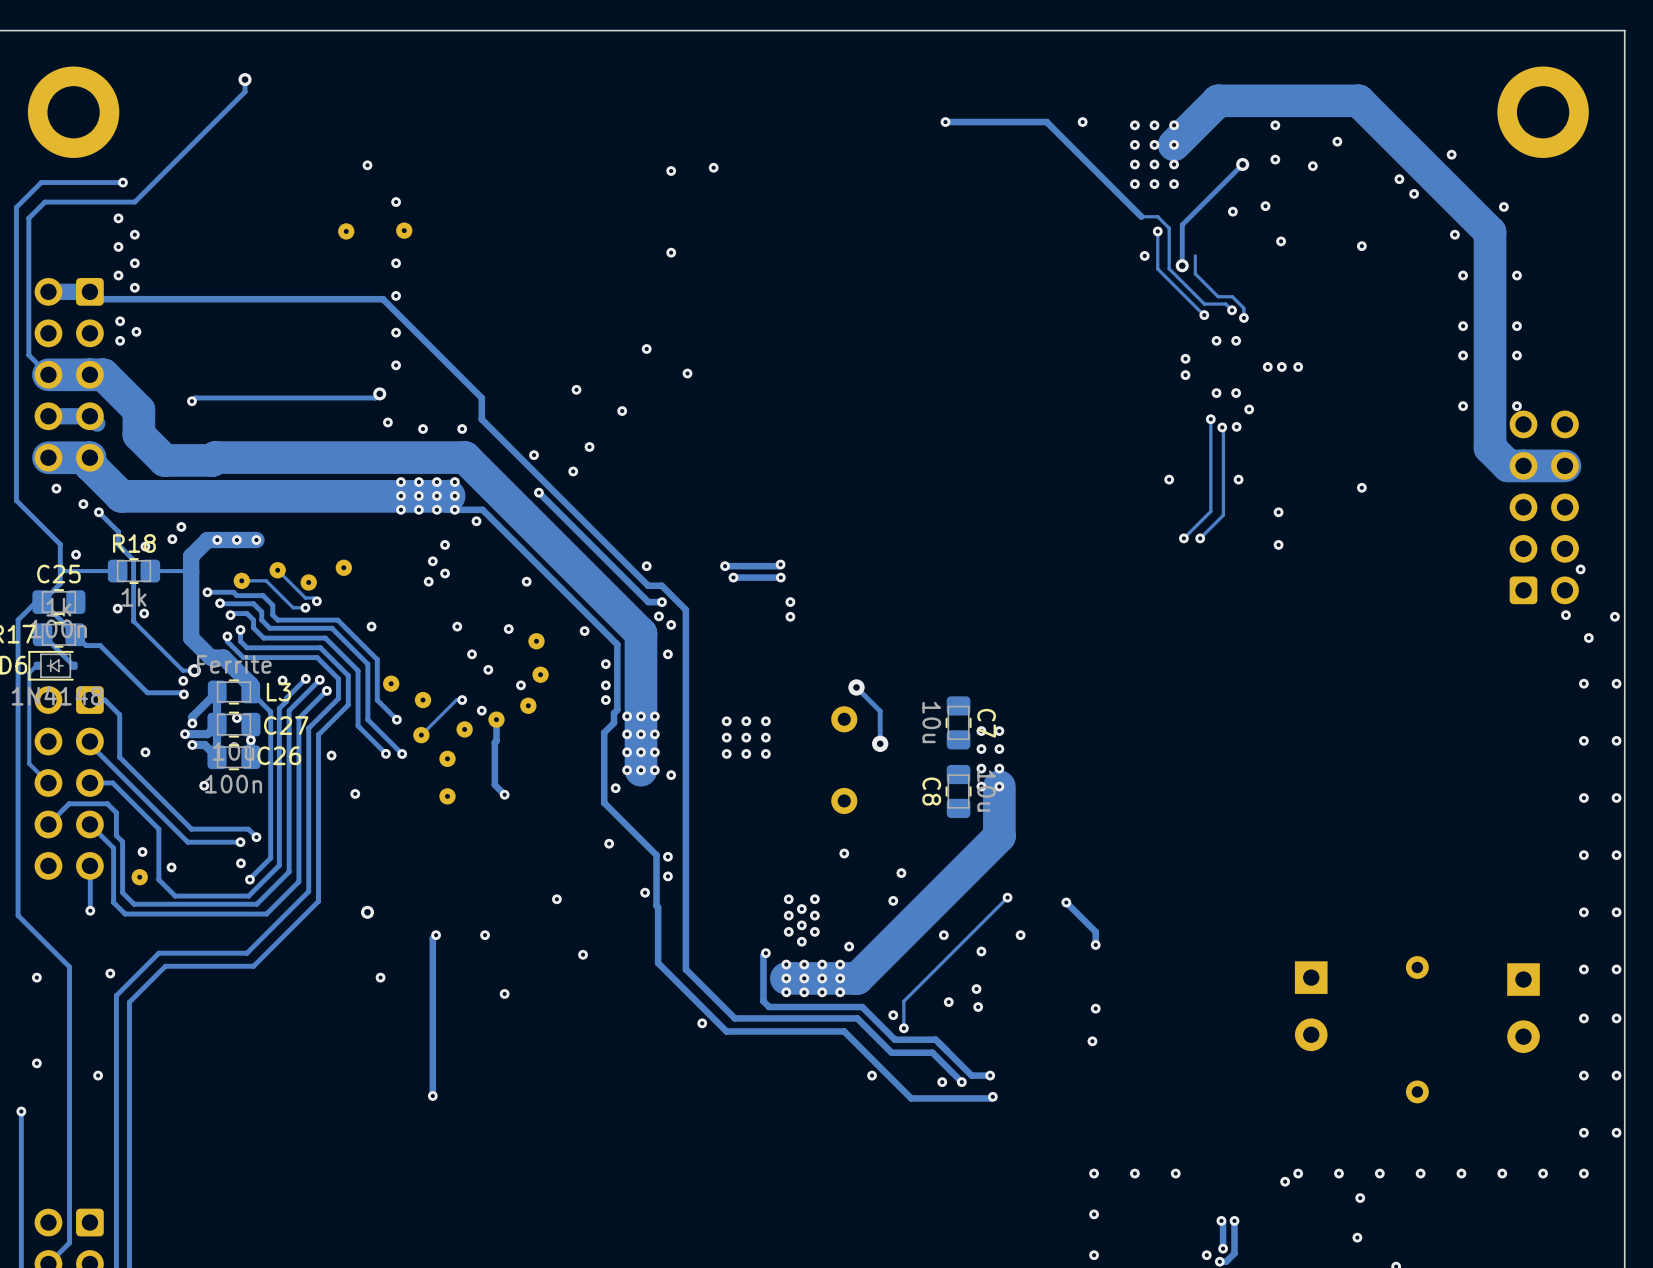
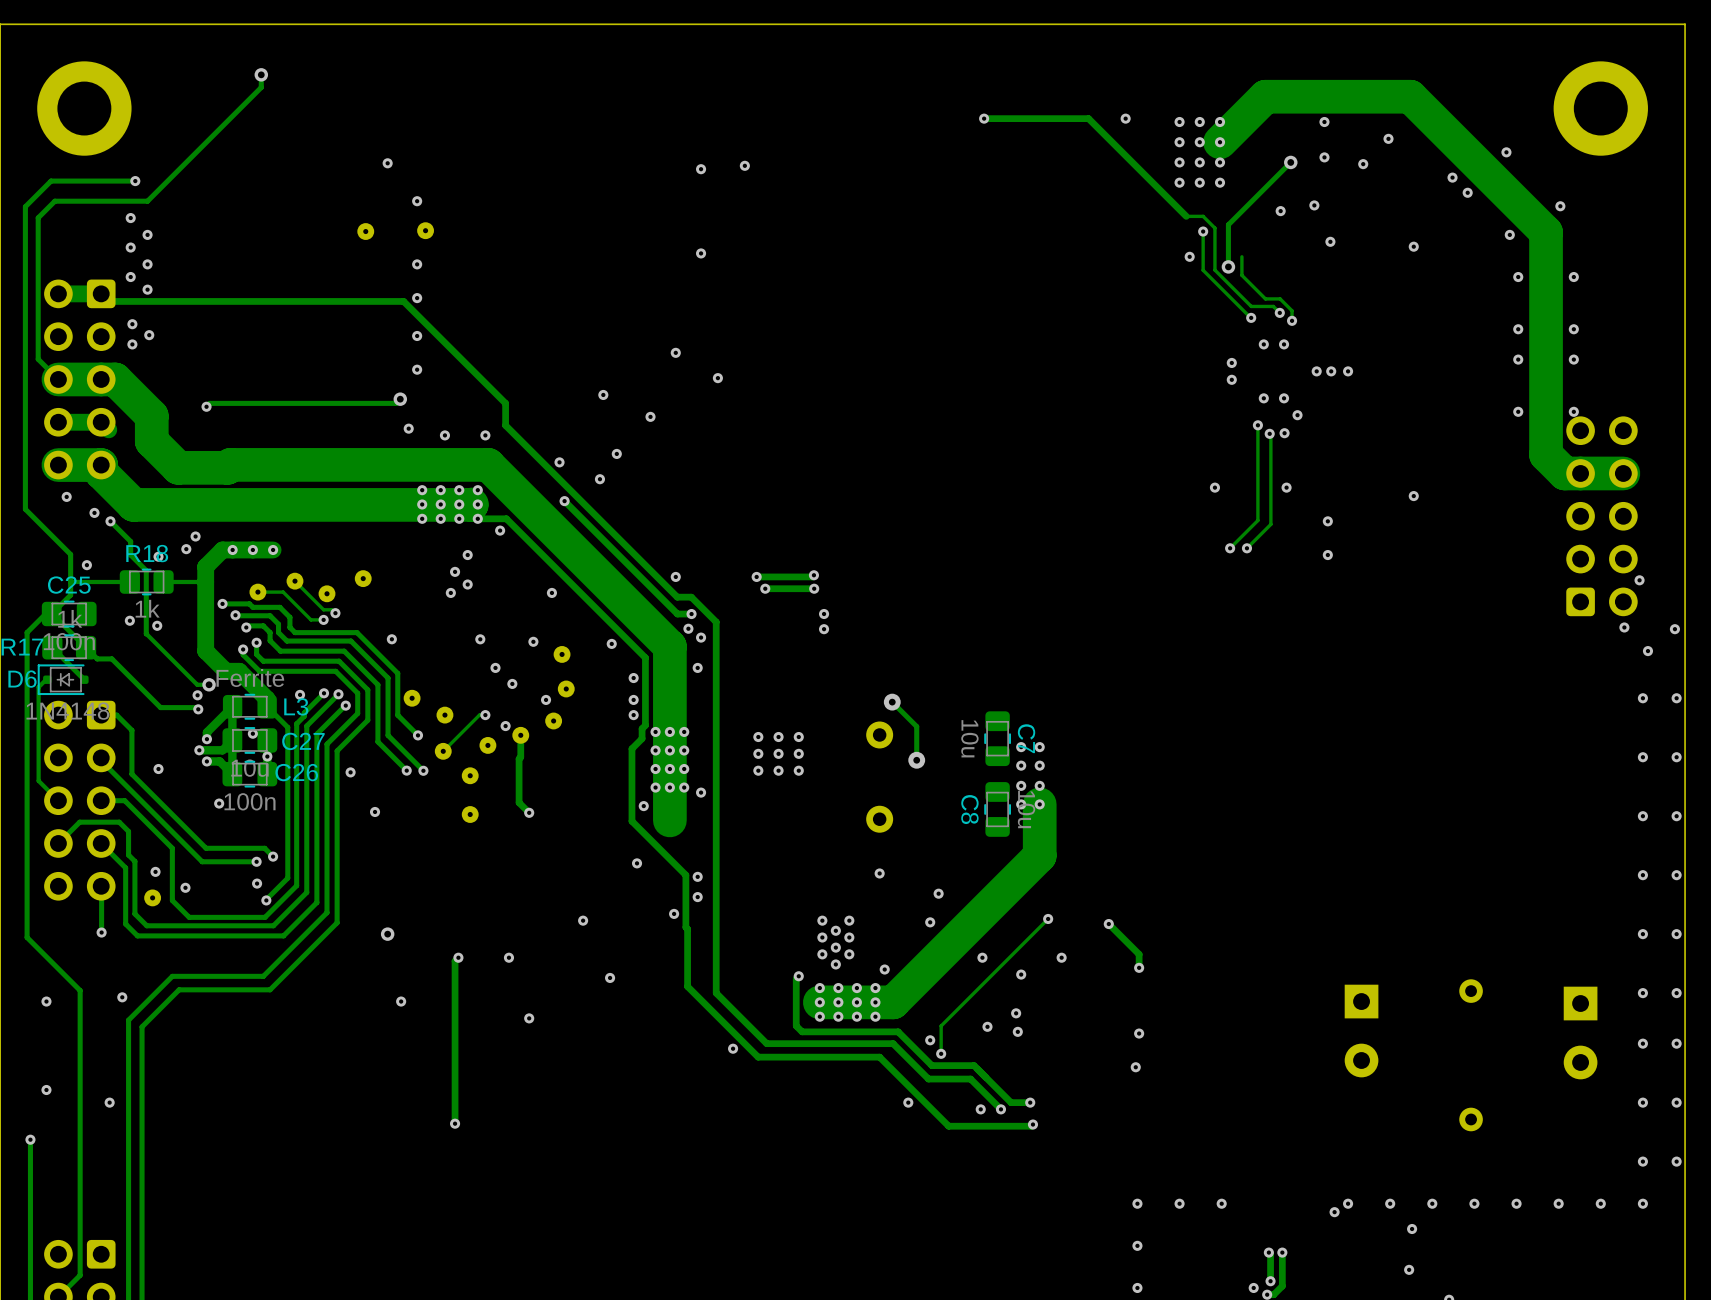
track: none -> (669, 787) (669, 820)

